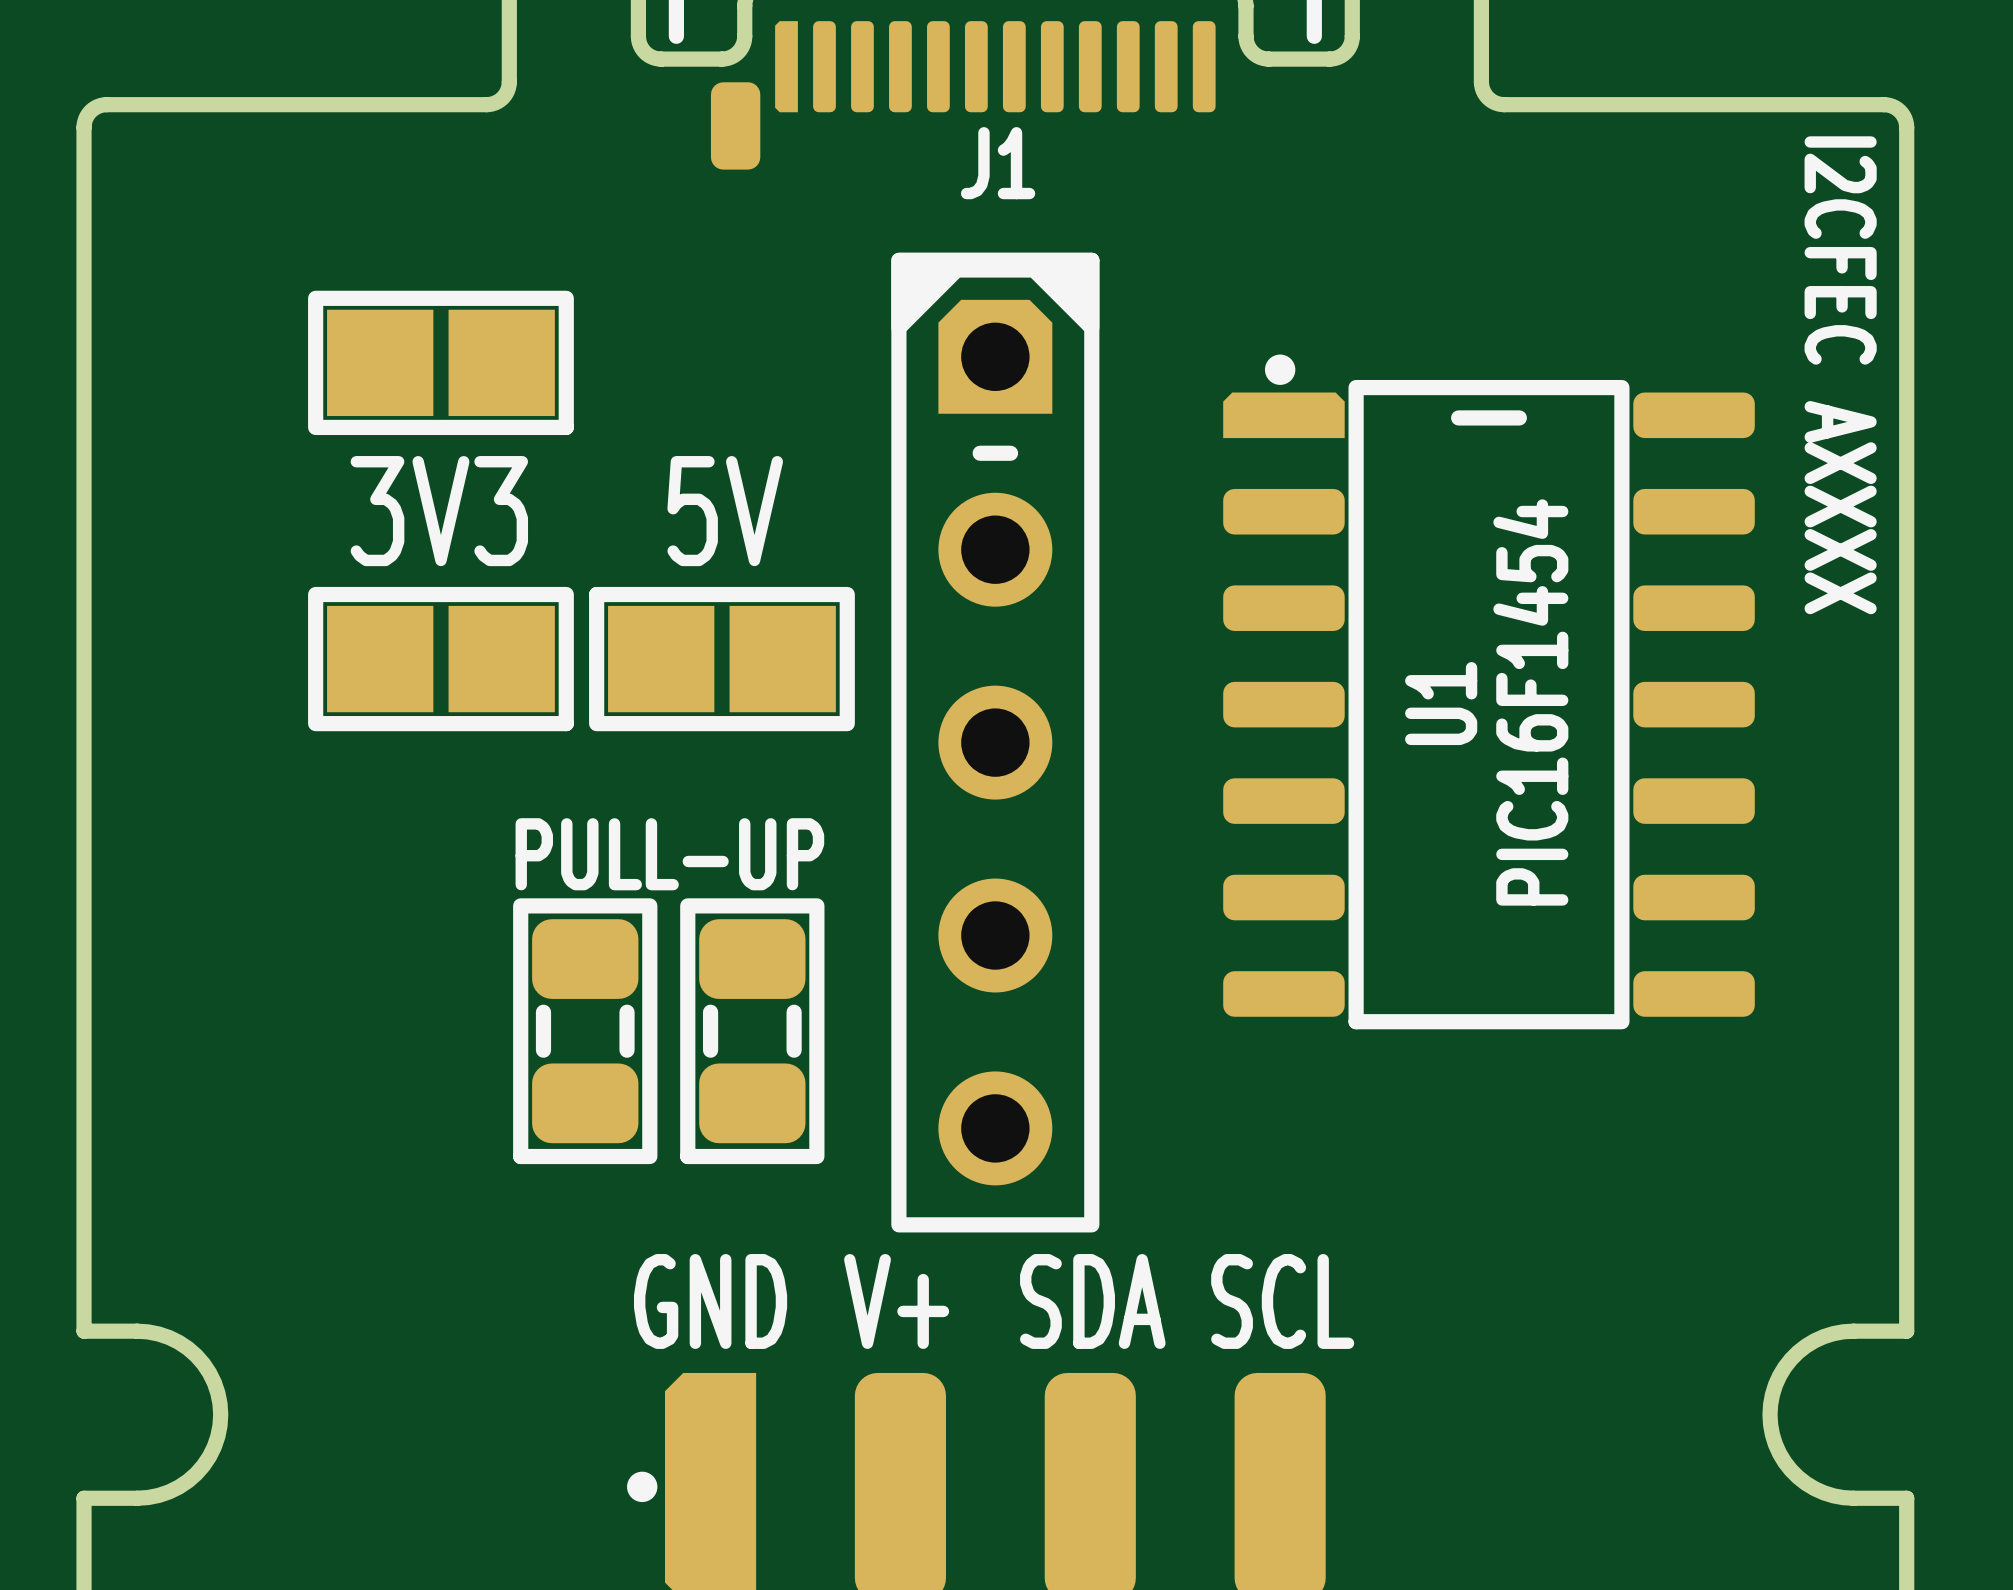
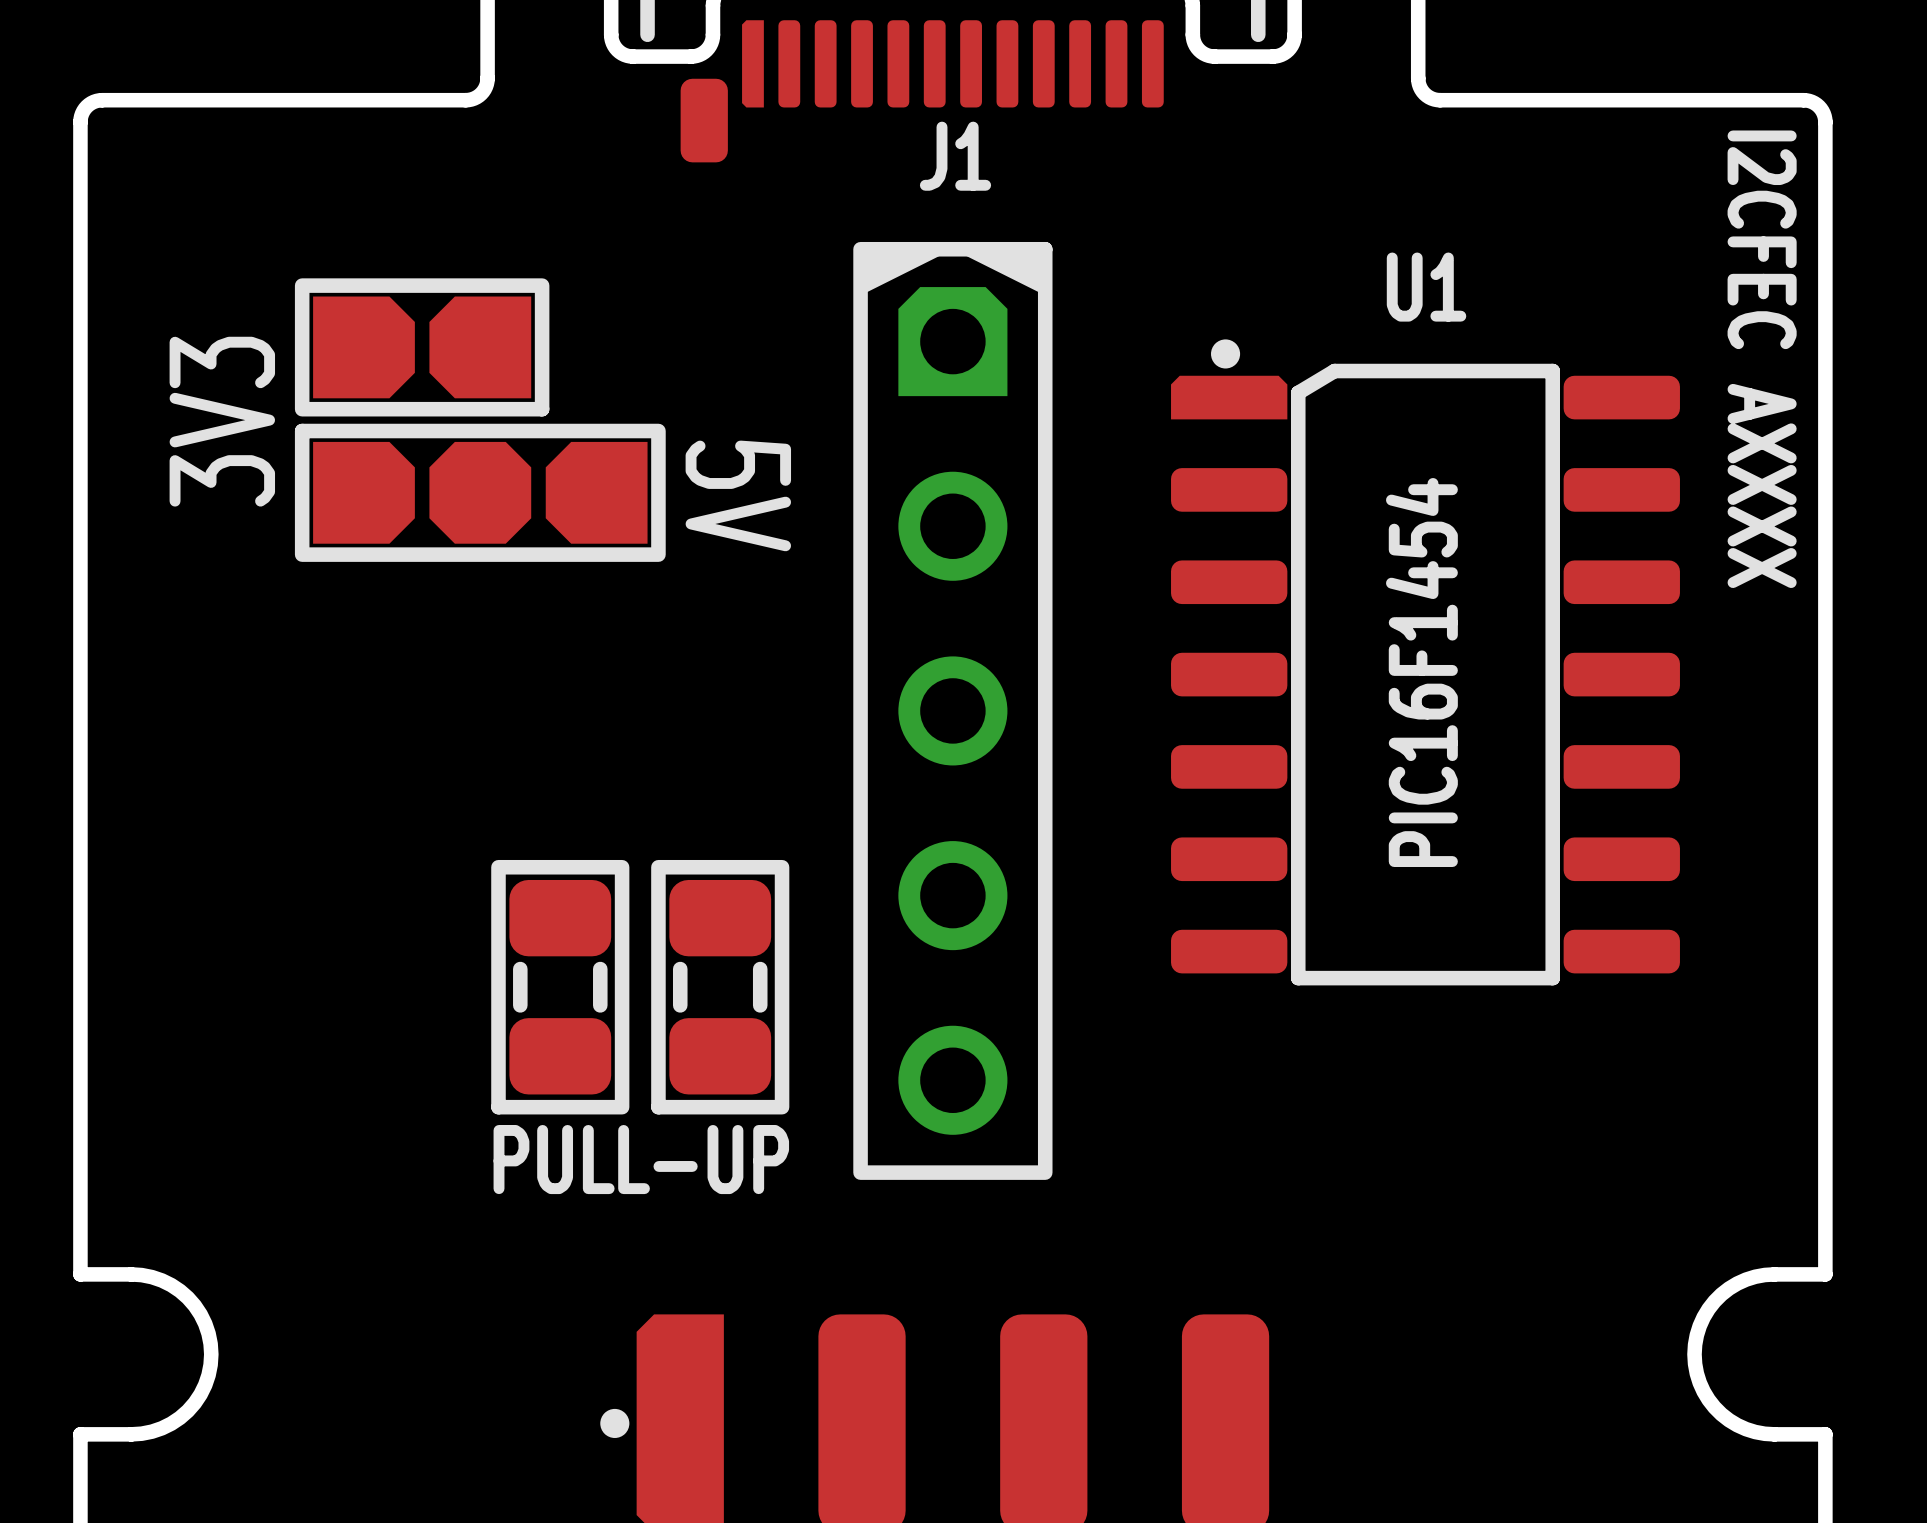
part footprint: [891, 252, 1100, 1233] -> [853, 241, 1053, 1180]
part footprint: [308, 290, 574, 436] -> [294, 278, 550, 417]
U1 footprint: [1223, 354, 1755, 1030] -> [1171, 339, 1680, 986]
text rotation: 0° (439, 511) -> 90° counterclockwise (222, 421)
text rotation: 0° (725, 511) -> 90° clockwise (738, 495)
part: none -> (480, 492)
part: (440, 659) -> none
part: (721, 659) -> none
U1 value position: PIC16F1454 (1530, 702) -> PIC16F1454 (1421, 672)
U1 name rotation: 0° (1441, 703) -> 90° clockwise (1426, 287)
U1 name position: U1 (1441, 703) -> U1 (1426, 287)
text position: PULL-UP (669, 854) -> PULL-UP (641, 1159)
text: GND (710, 1301) -> none
text: V+ (896, 1301) -> none
text: SDA (1092, 1301) -> none
text: SCL (1282, 1301) -> none

